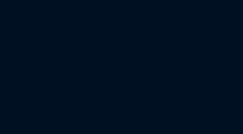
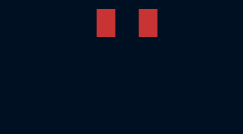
part: none -> (127, 22)

